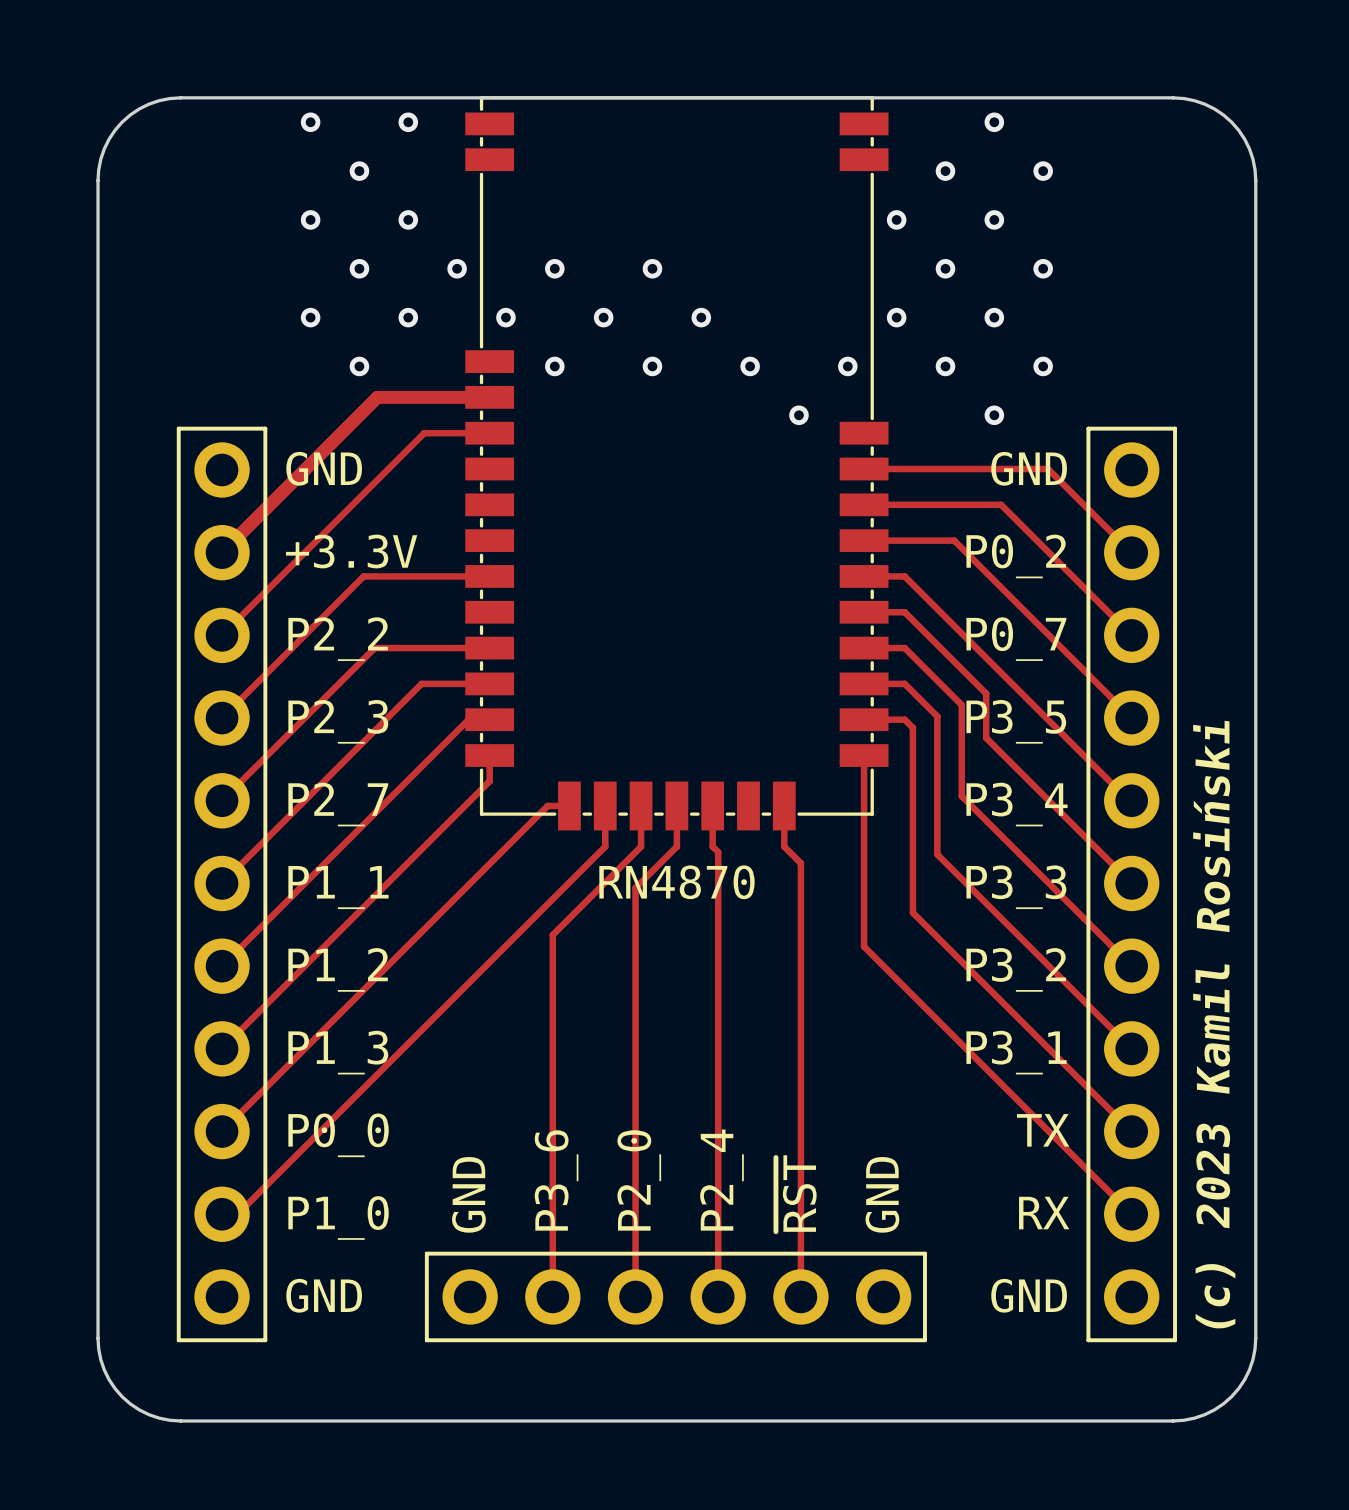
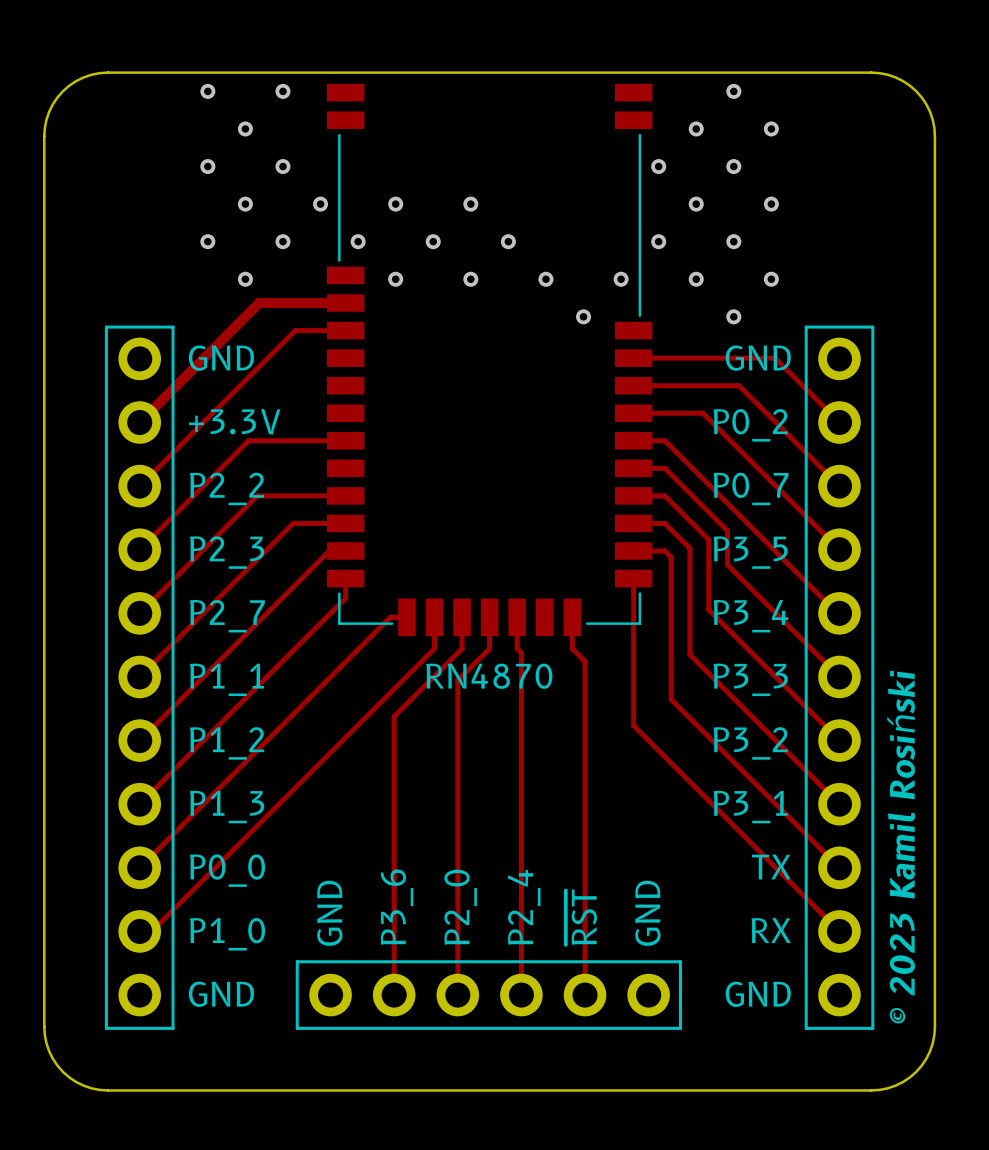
part footprint: [465, 96, 889, 831] -> [326, 83, 653, 637]
text: (c) 2023 Kamil Rosiński (1214, 1024) -> © 2023 Kamil Rosiński (901, 847)

